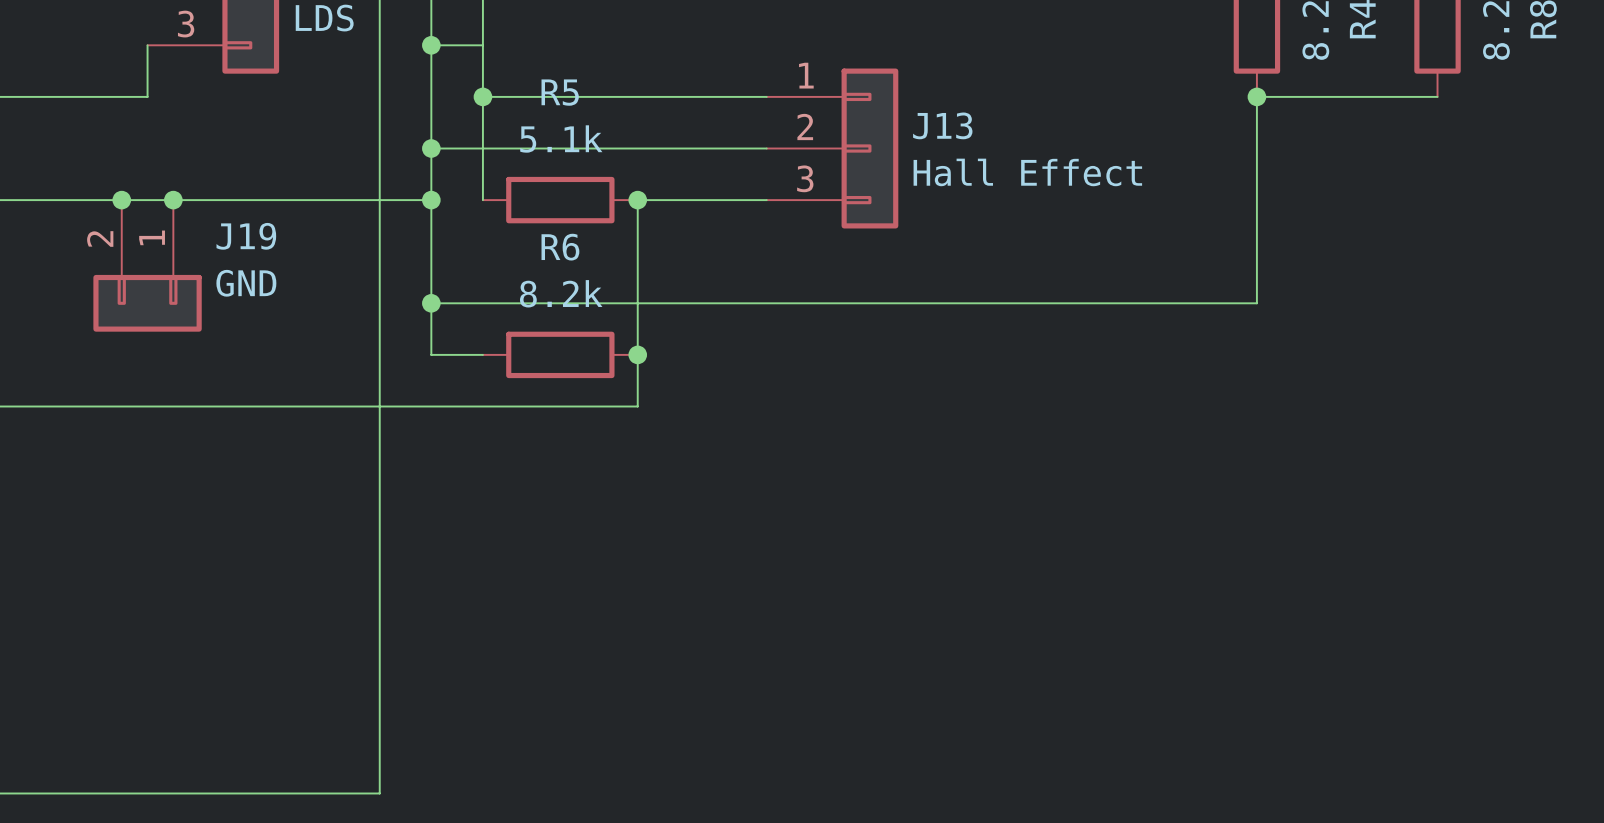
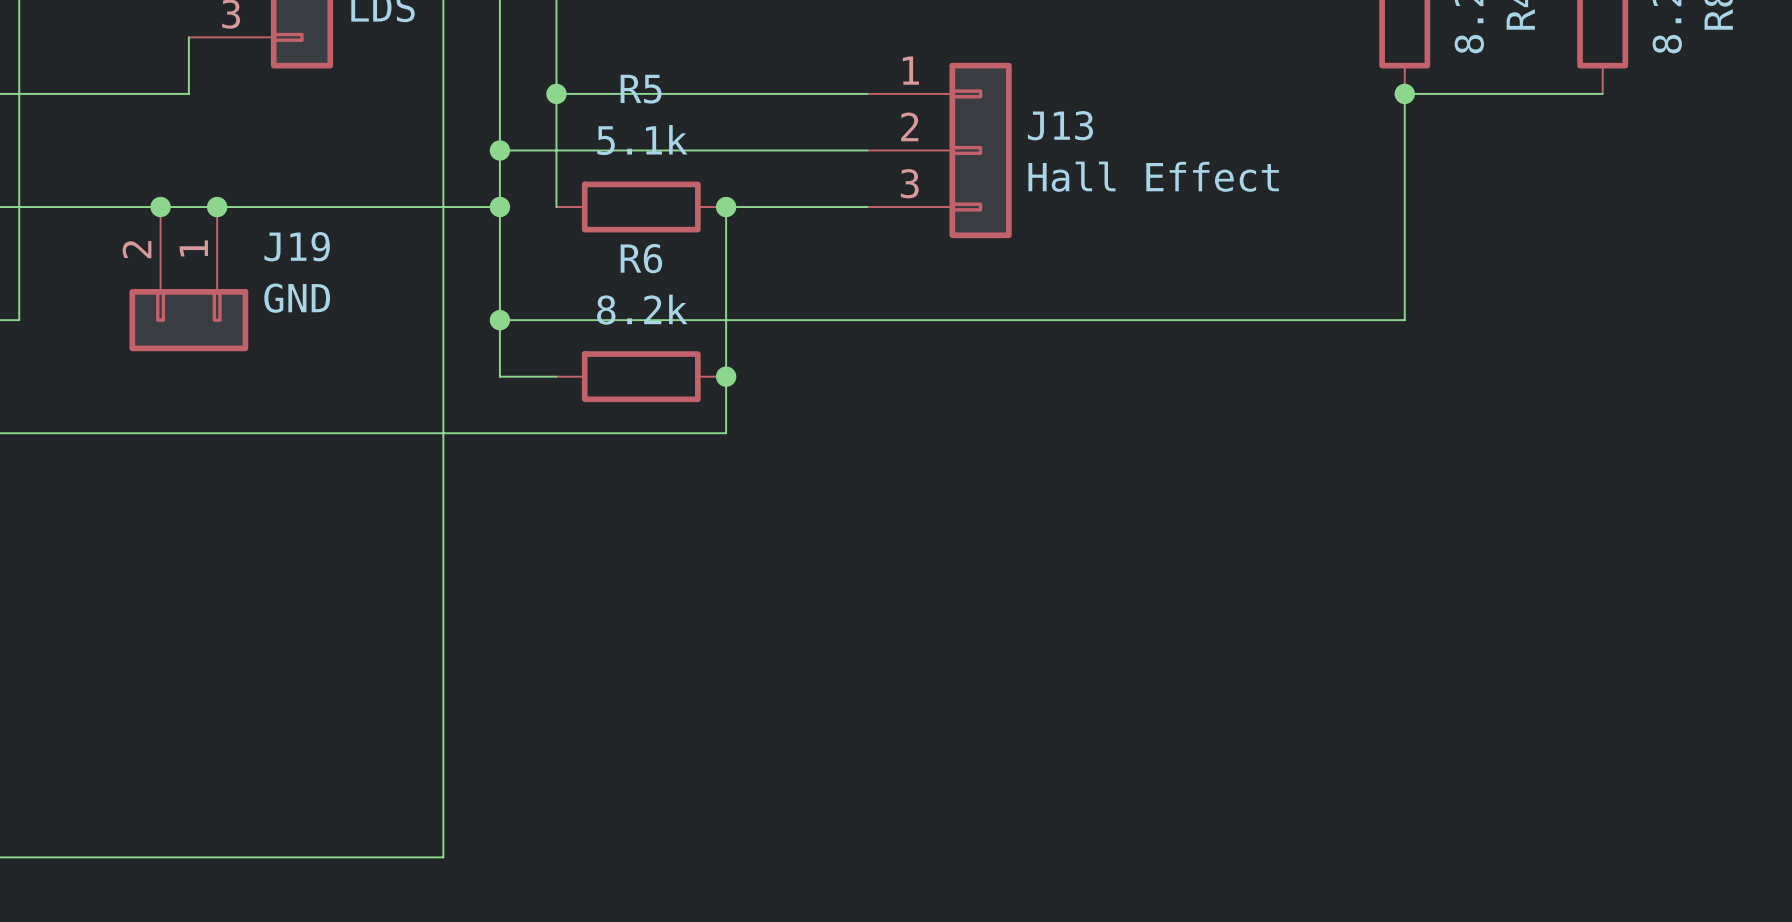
wire: (431, 45) (482, 45) -> none
junction: (431, 45) -> none

